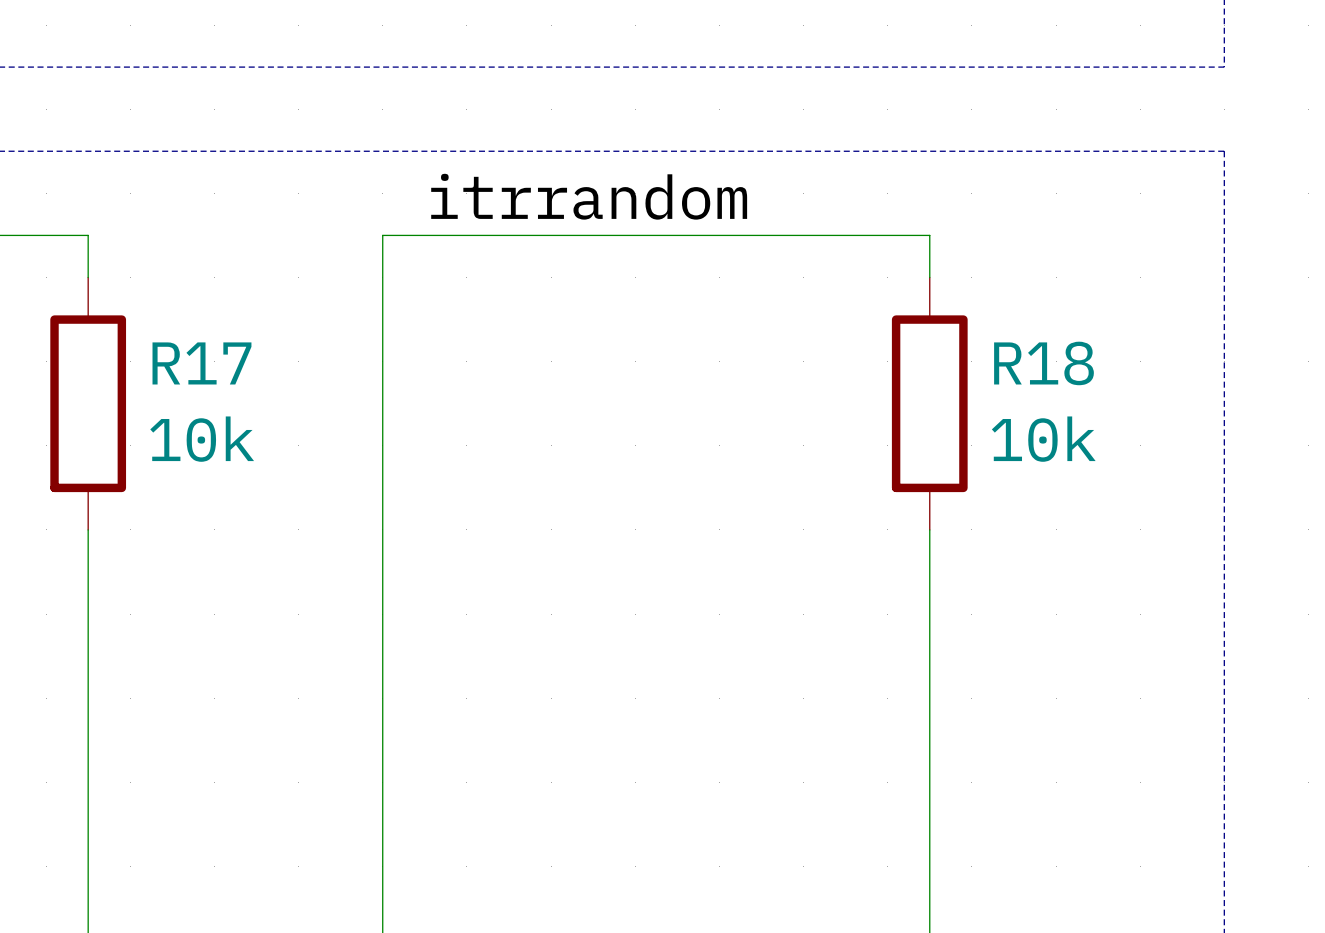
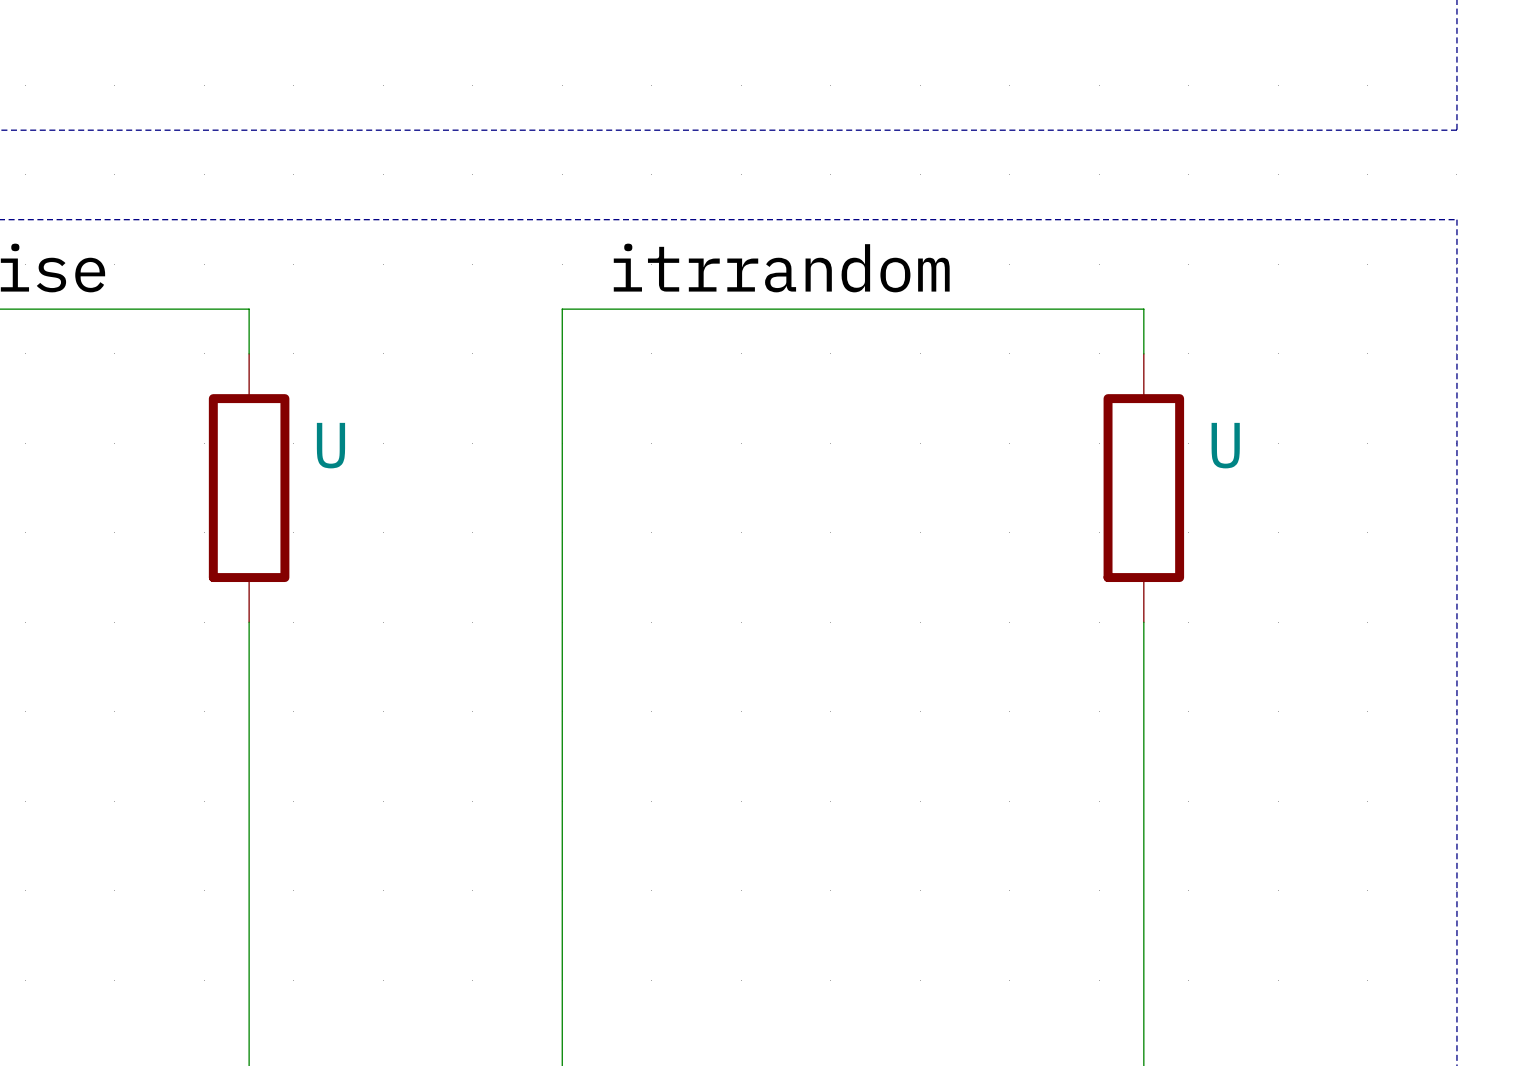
R17 name: R17 (201, 363) -> U (330, 445)
R18 name: R18 (1043, 363) -> U (1225, 445)
R17 value: 10k (202, 439) -> none
R18 value: 10k (1043, 439) -> none

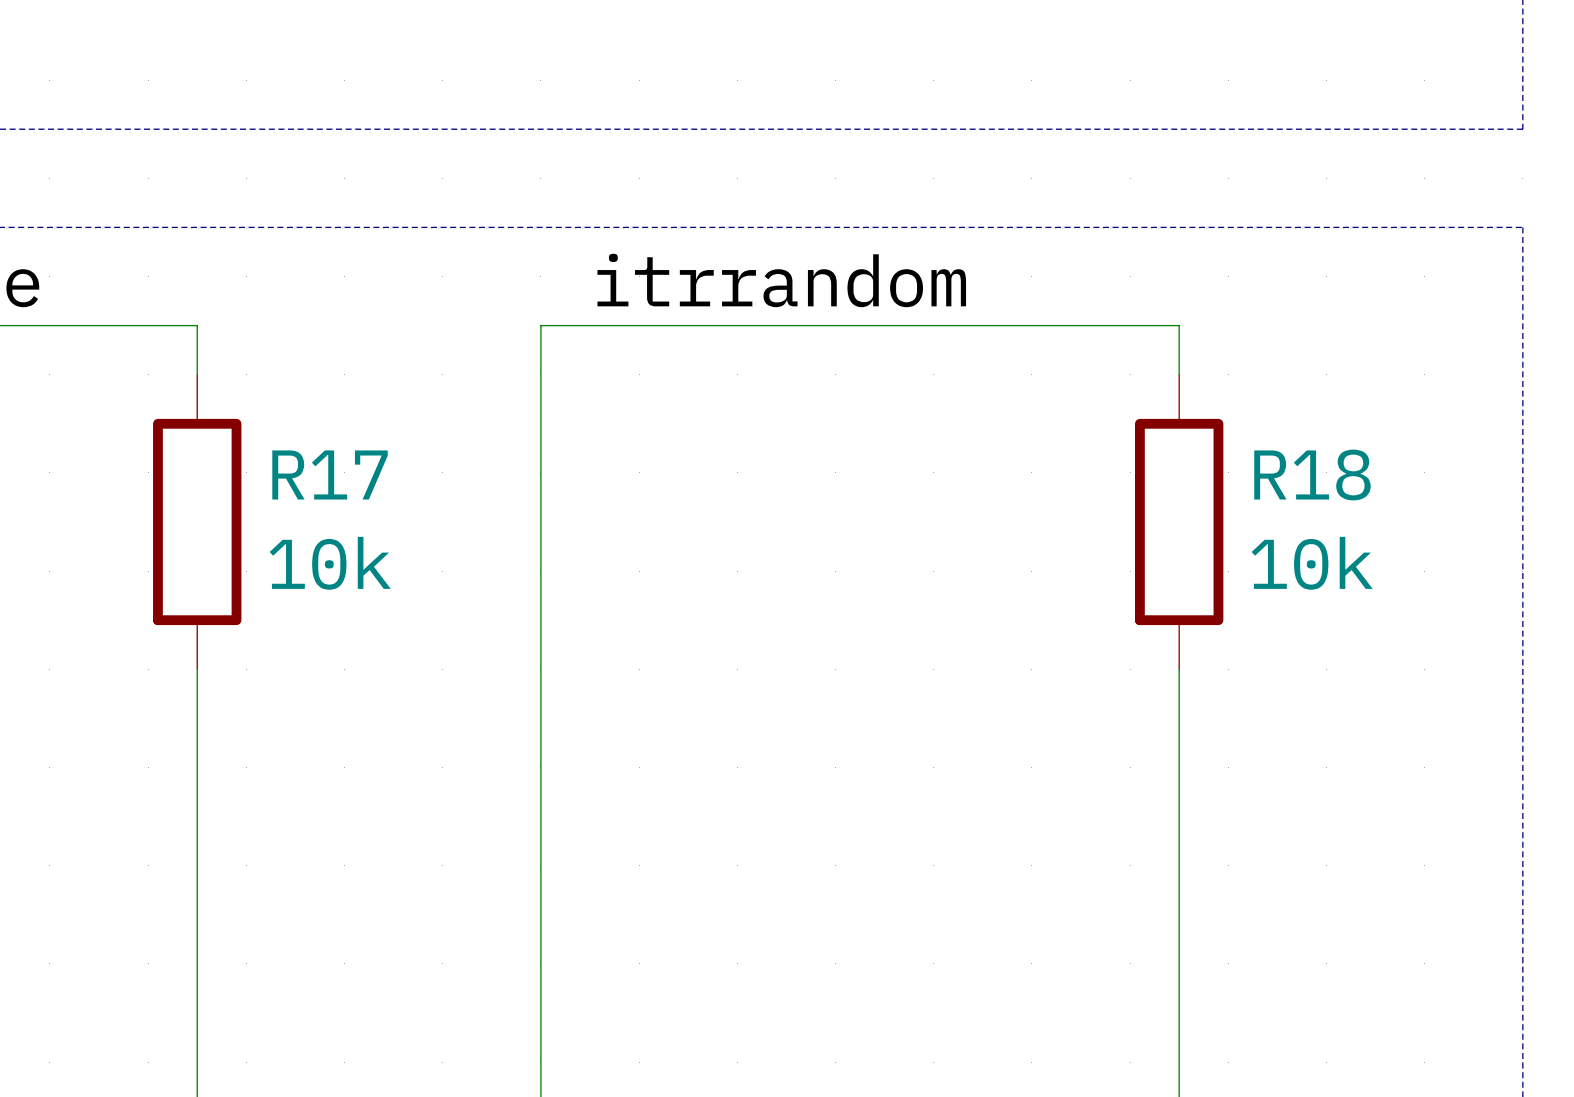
U name: U (330, 445) -> R17 (330, 474)
U name: U (1225, 445) -> R18 (1312, 474)
U value: none -> 10k (330, 563)
U value: none -> 10k (1312, 563)

